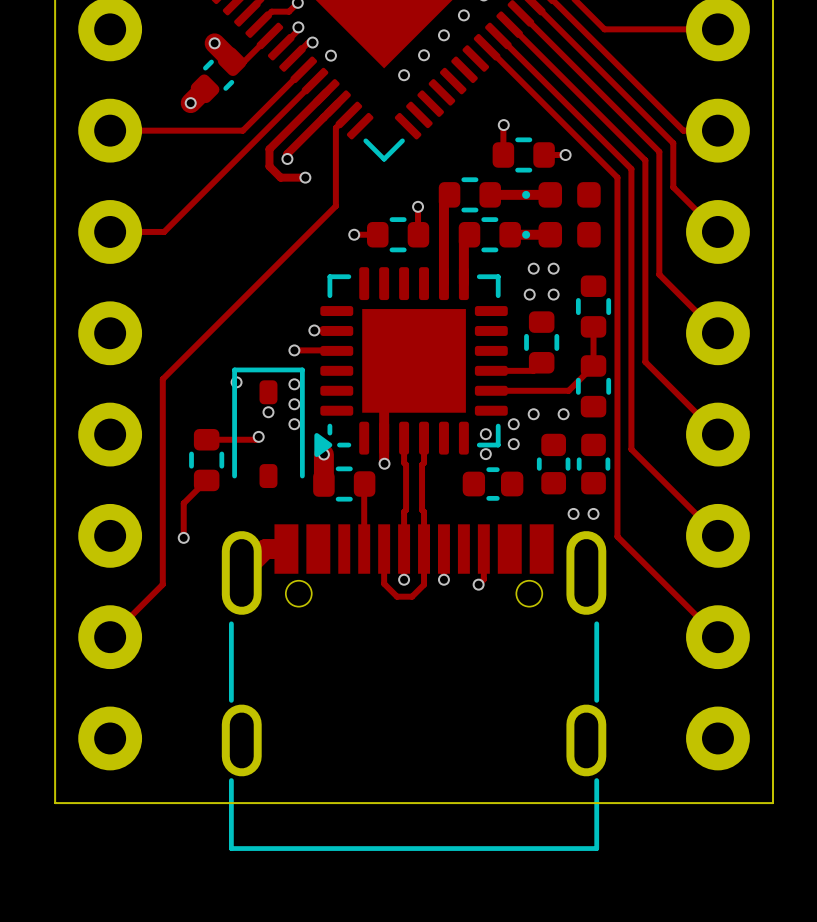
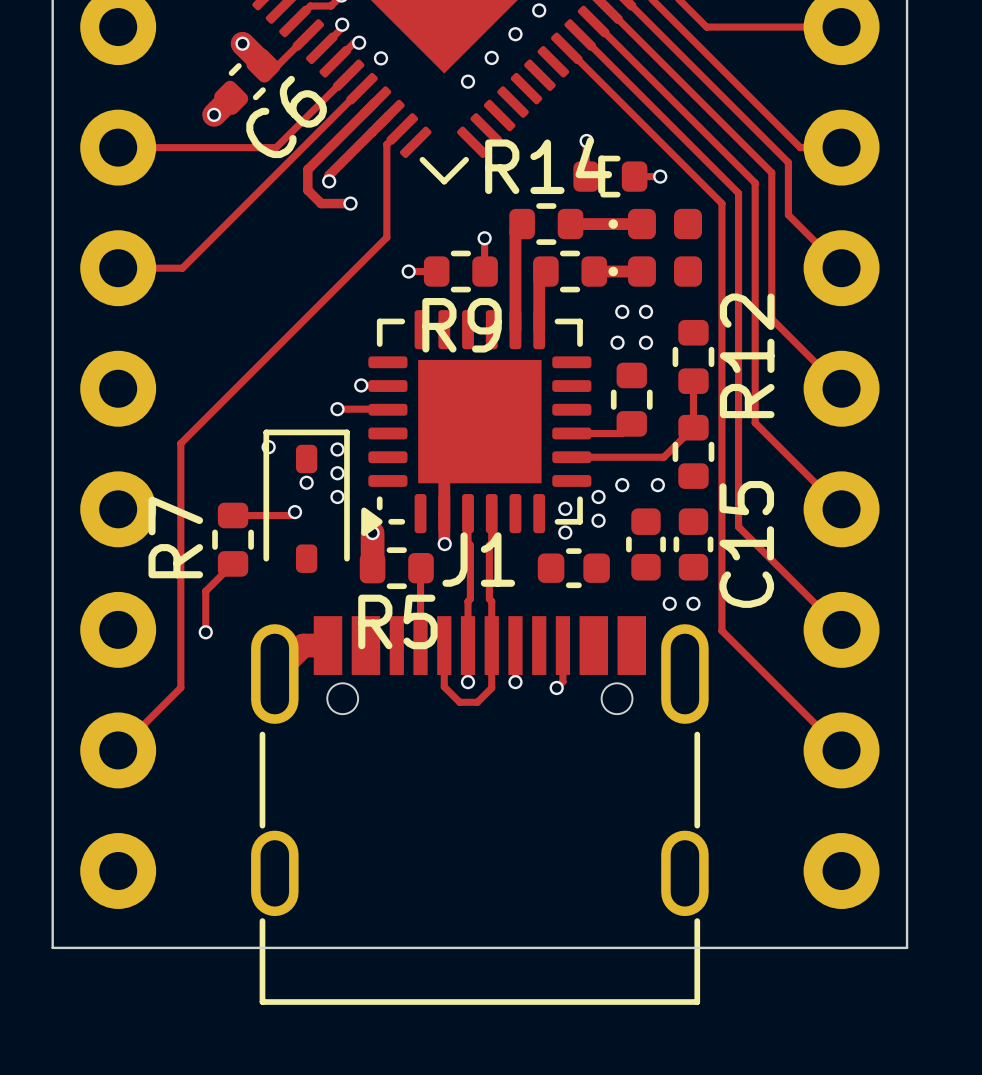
C6 name: none -> C6 (286, 116)
R14 name: none -> R14 (548, 165)
R9 name: none -> R9 (462, 325)
R12 name: none -> R12 (747, 355)
R7 name: none -> R7 (175, 537)
C15 name: none -> C15 (746, 544)
J1 name: none -> J1 (478, 559)
R5 name: none -> R5 (397, 621)

